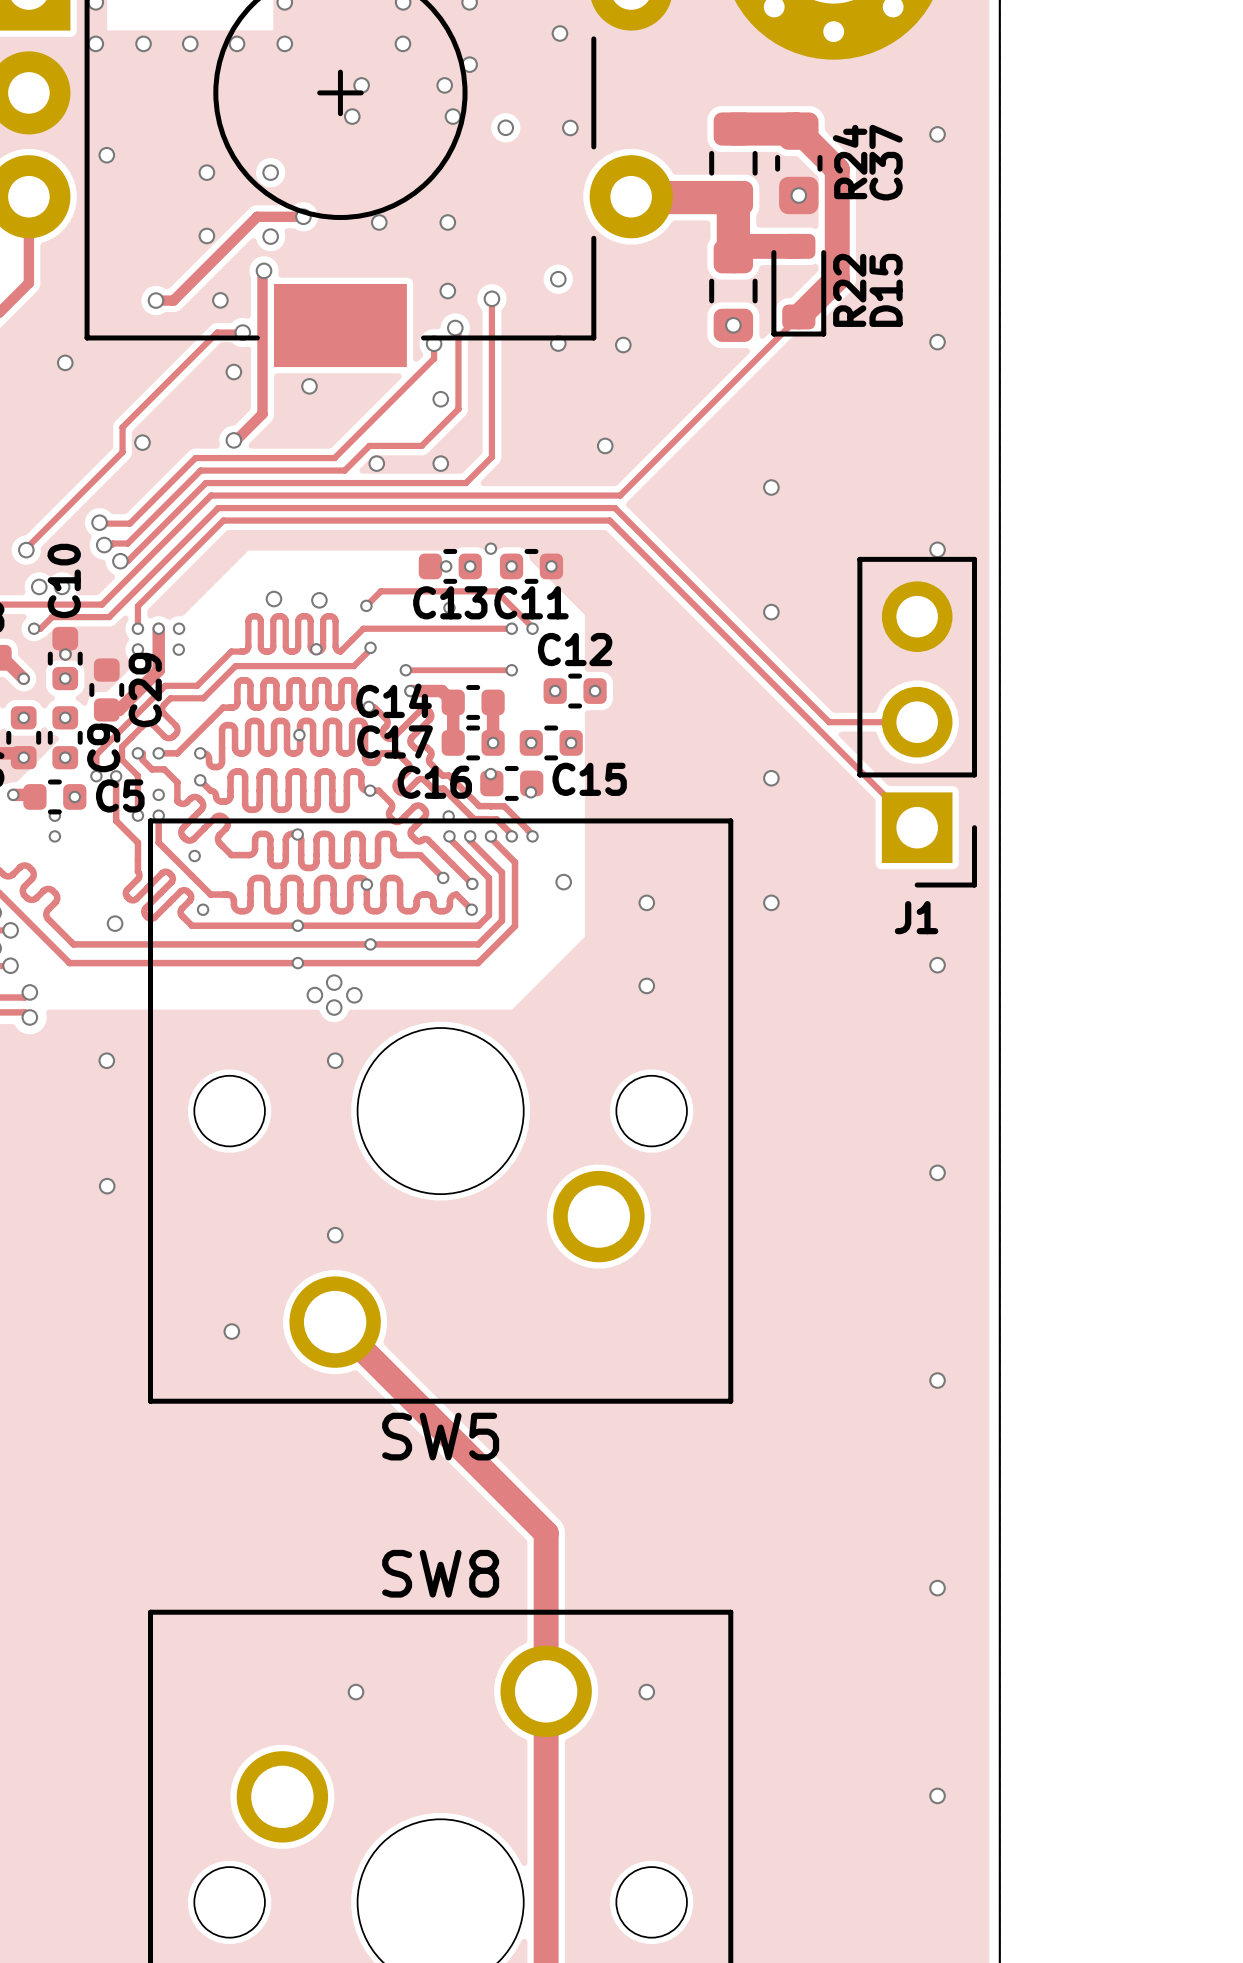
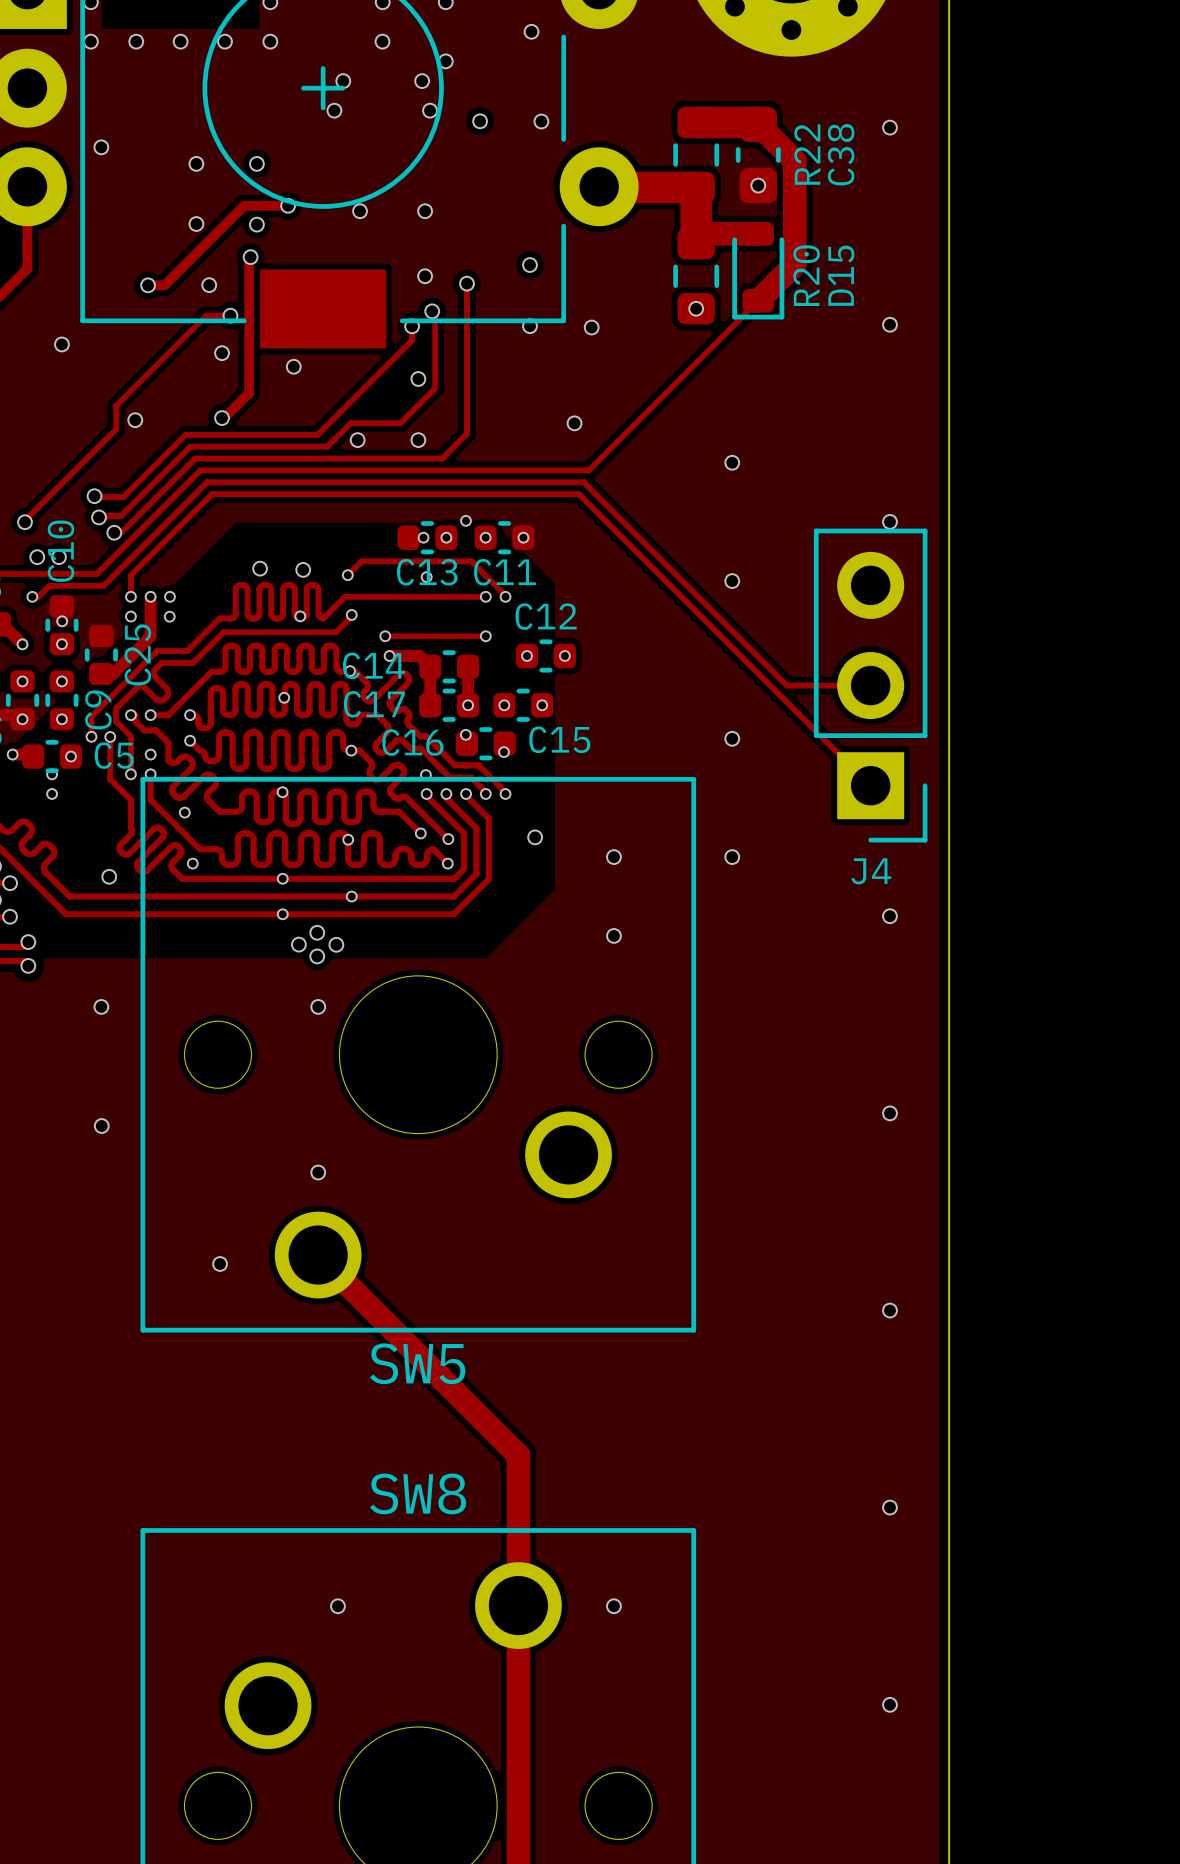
R24 name: R24 (850, 162) -> R22 (807, 154)
C37 name: C37 (886, 162) -> C38 (841, 154)
R22 name: R22 (849, 290) -> R20 (806, 275)
C29 name: C29 (145, 689) -> C25 (137, 654)
J1 name: J1 (916, 917) -> J4 (871, 871)

